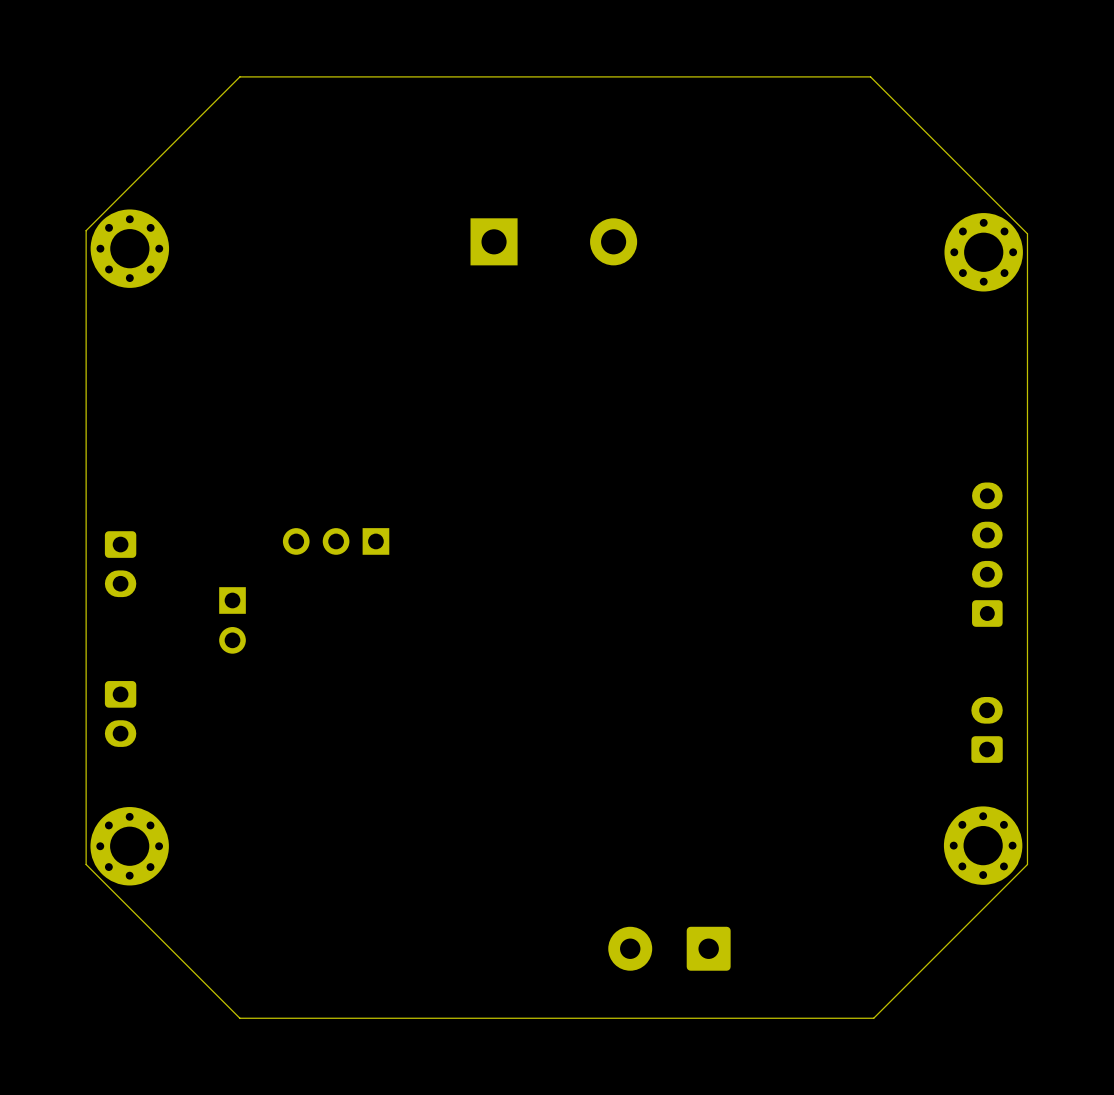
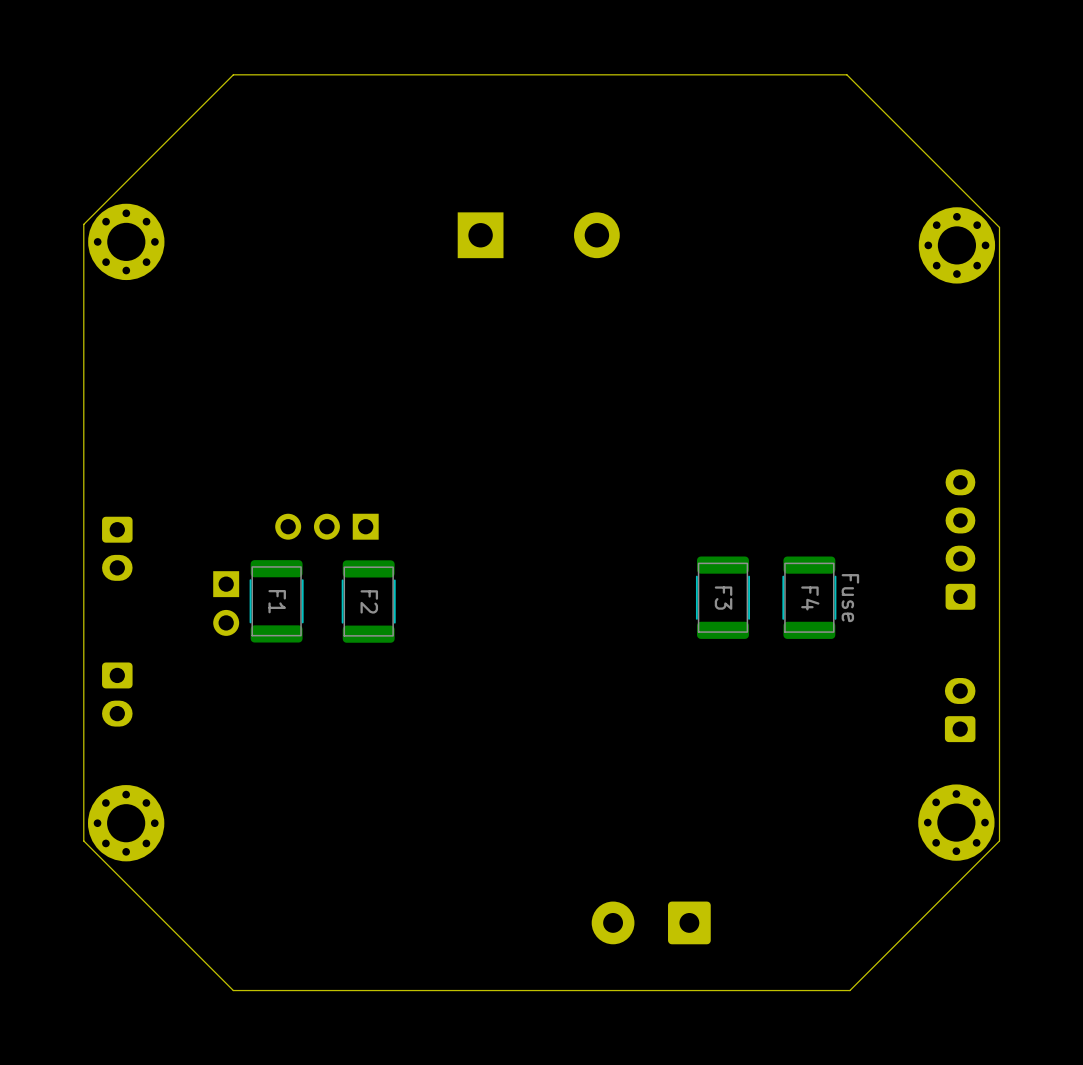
F3: none -> (722, 597)
F4: none -> Fuse (809, 597)
F1: none -> (276, 601)
F2: none -> (368, 601)

